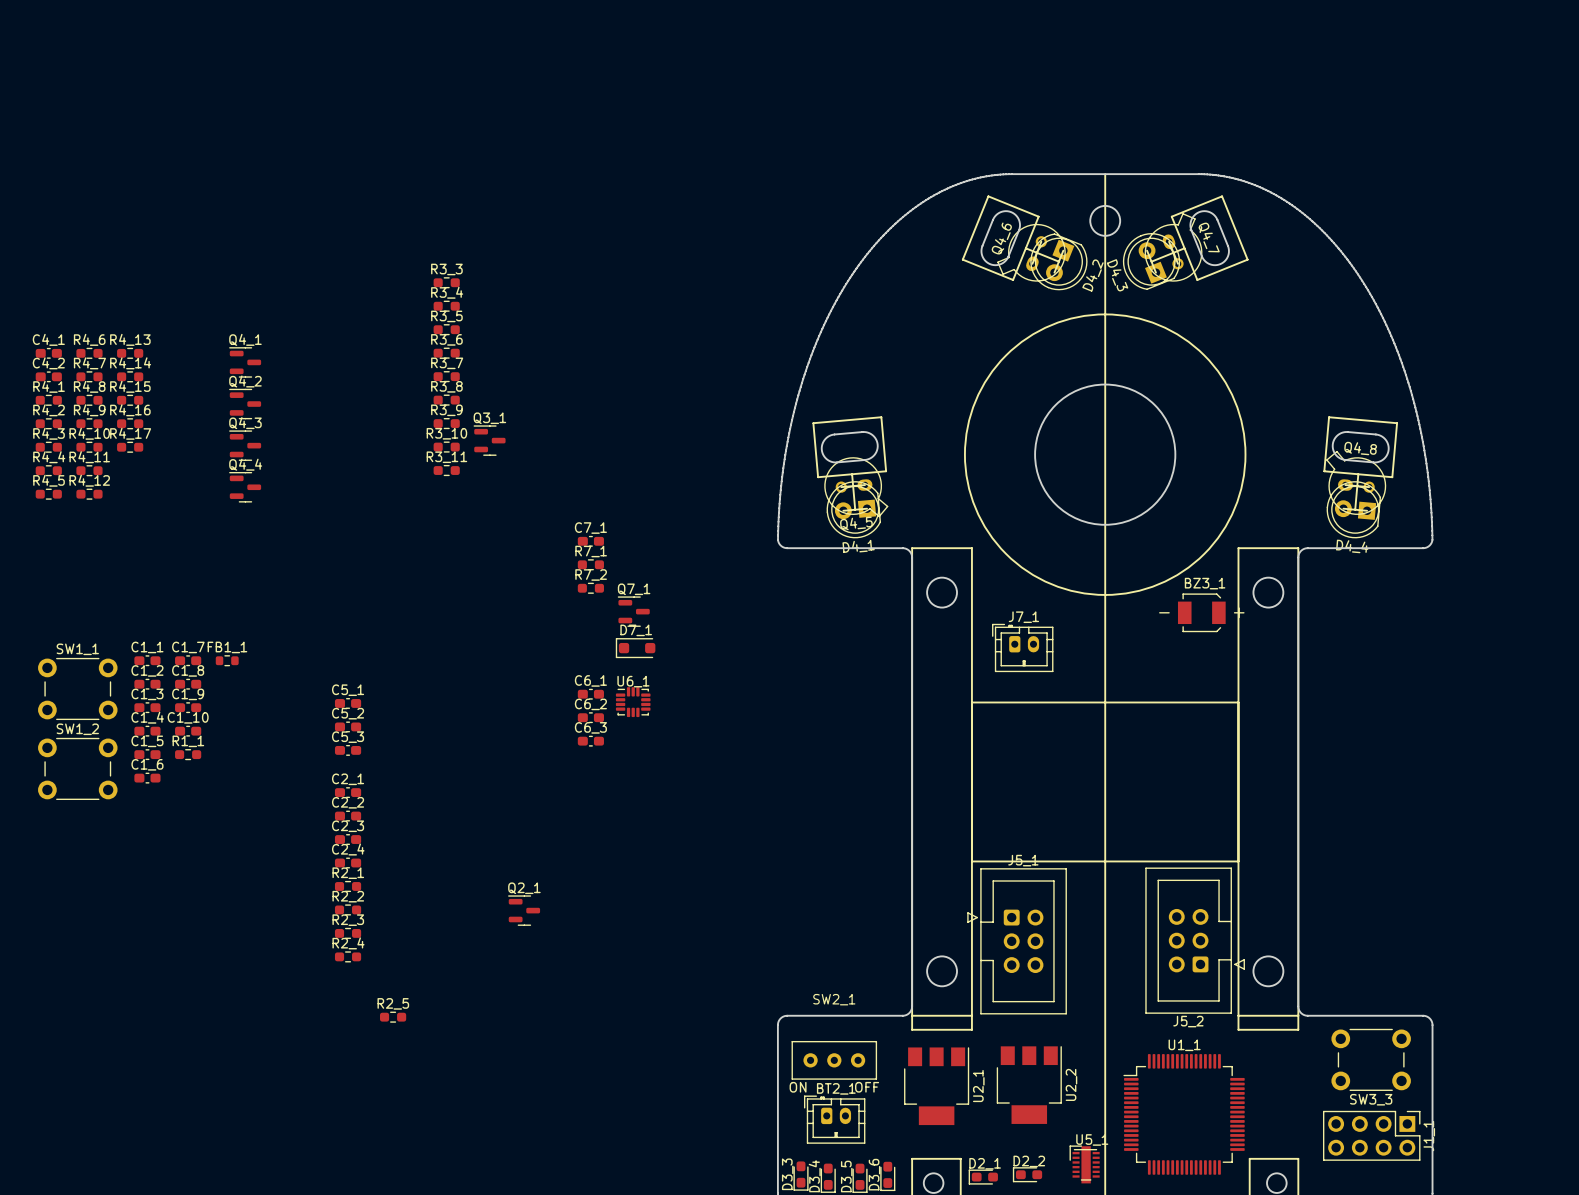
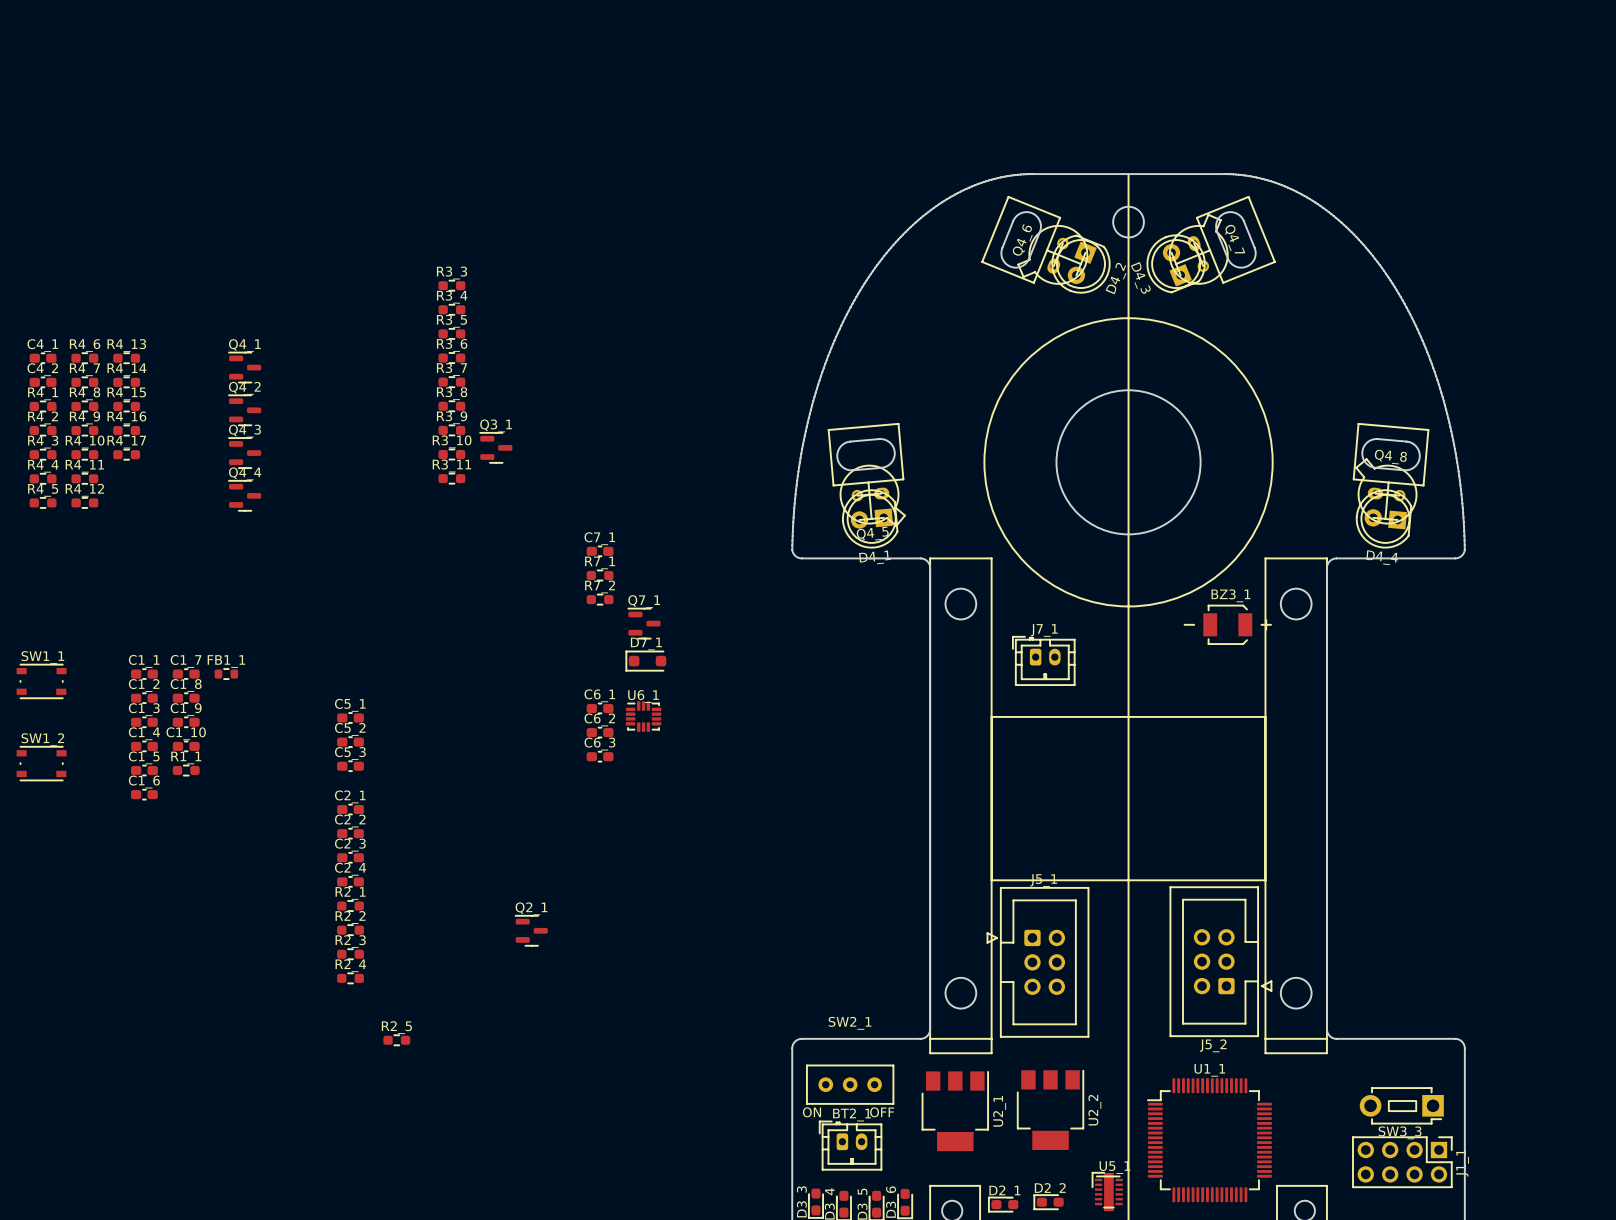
SW1_1 footprint: [38, 658, 118, 720] -> [16, 664, 67, 699]
SW1_2 footprint: [38, 737, 118, 800] -> [16, 746, 67, 782]
SW3_3 footprint: [1331, 1028, 1411, 1091] -> [1359, 1087, 1444, 1125]

